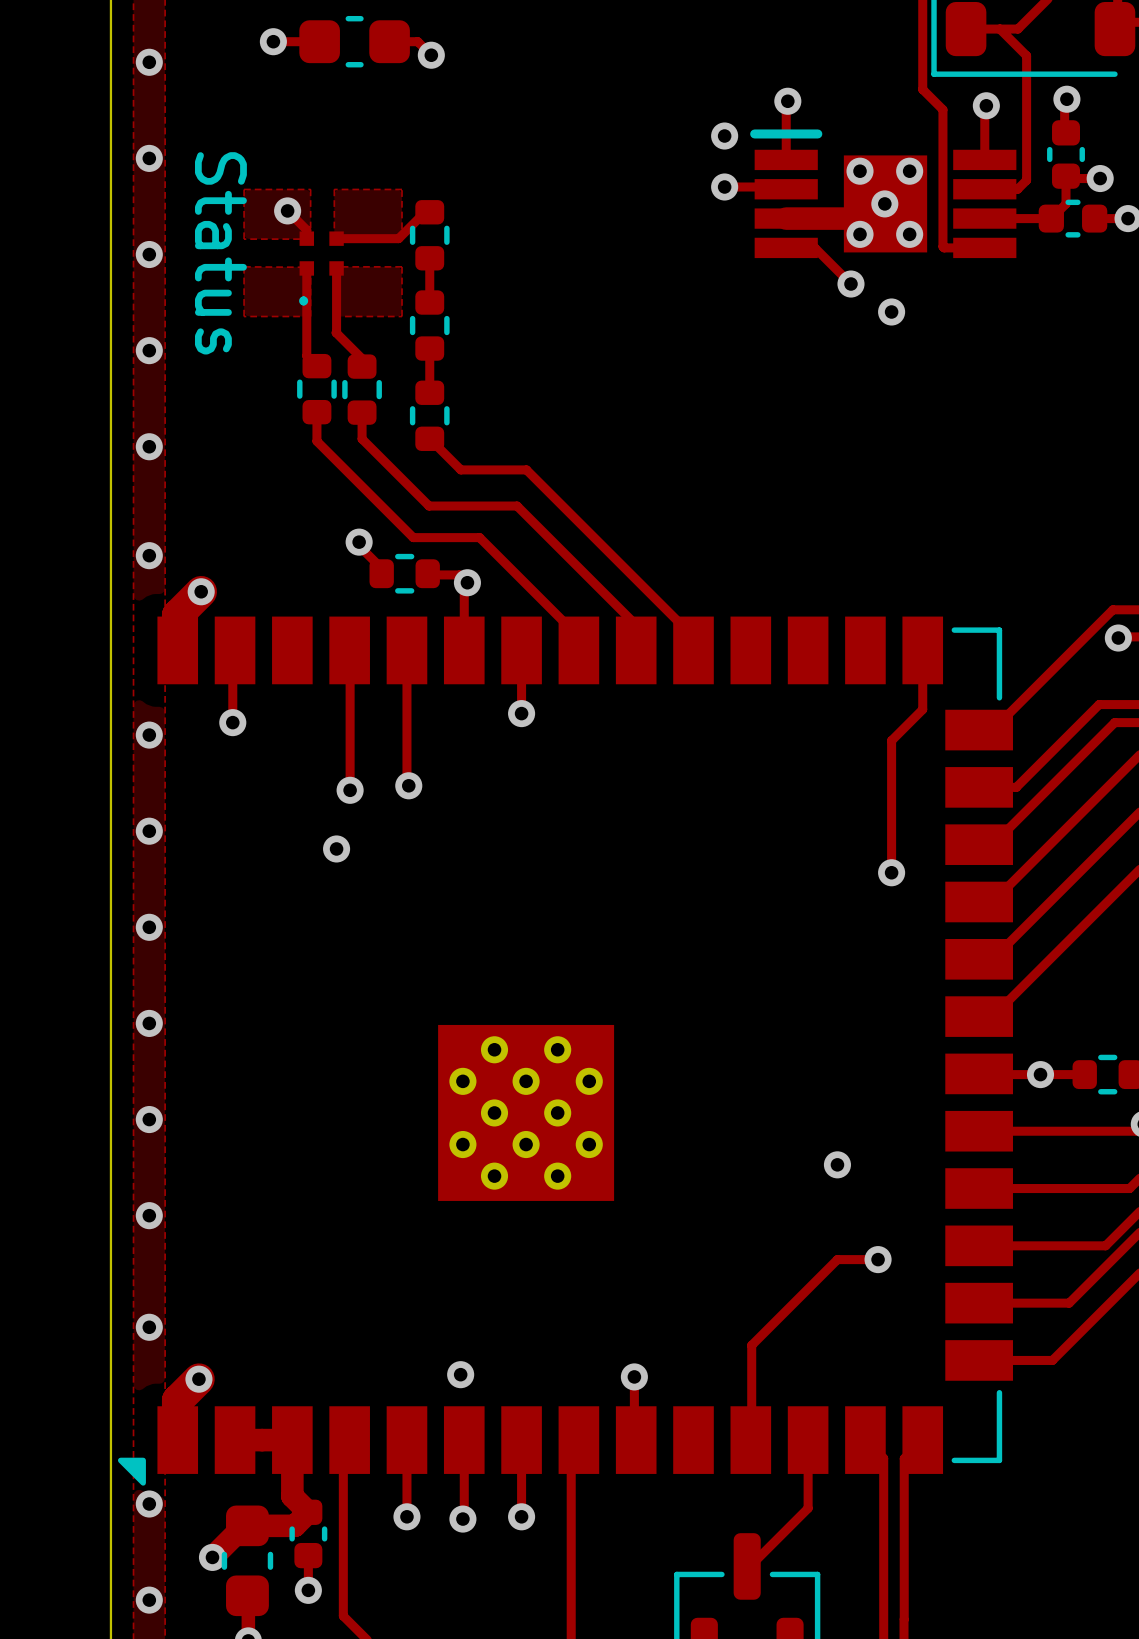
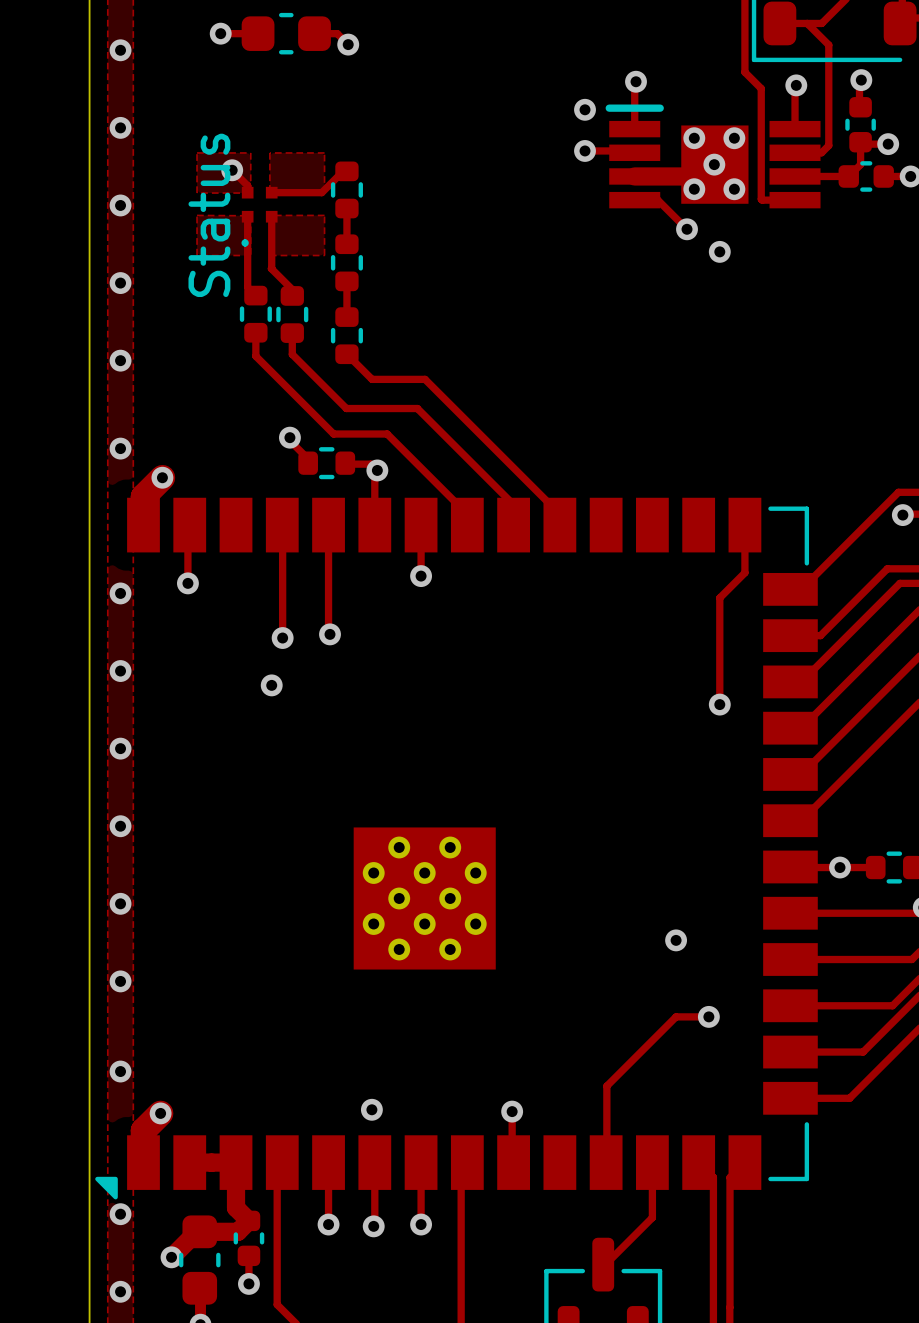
part text rotation: 0° (220, 253) -> 180° (209, 215)

